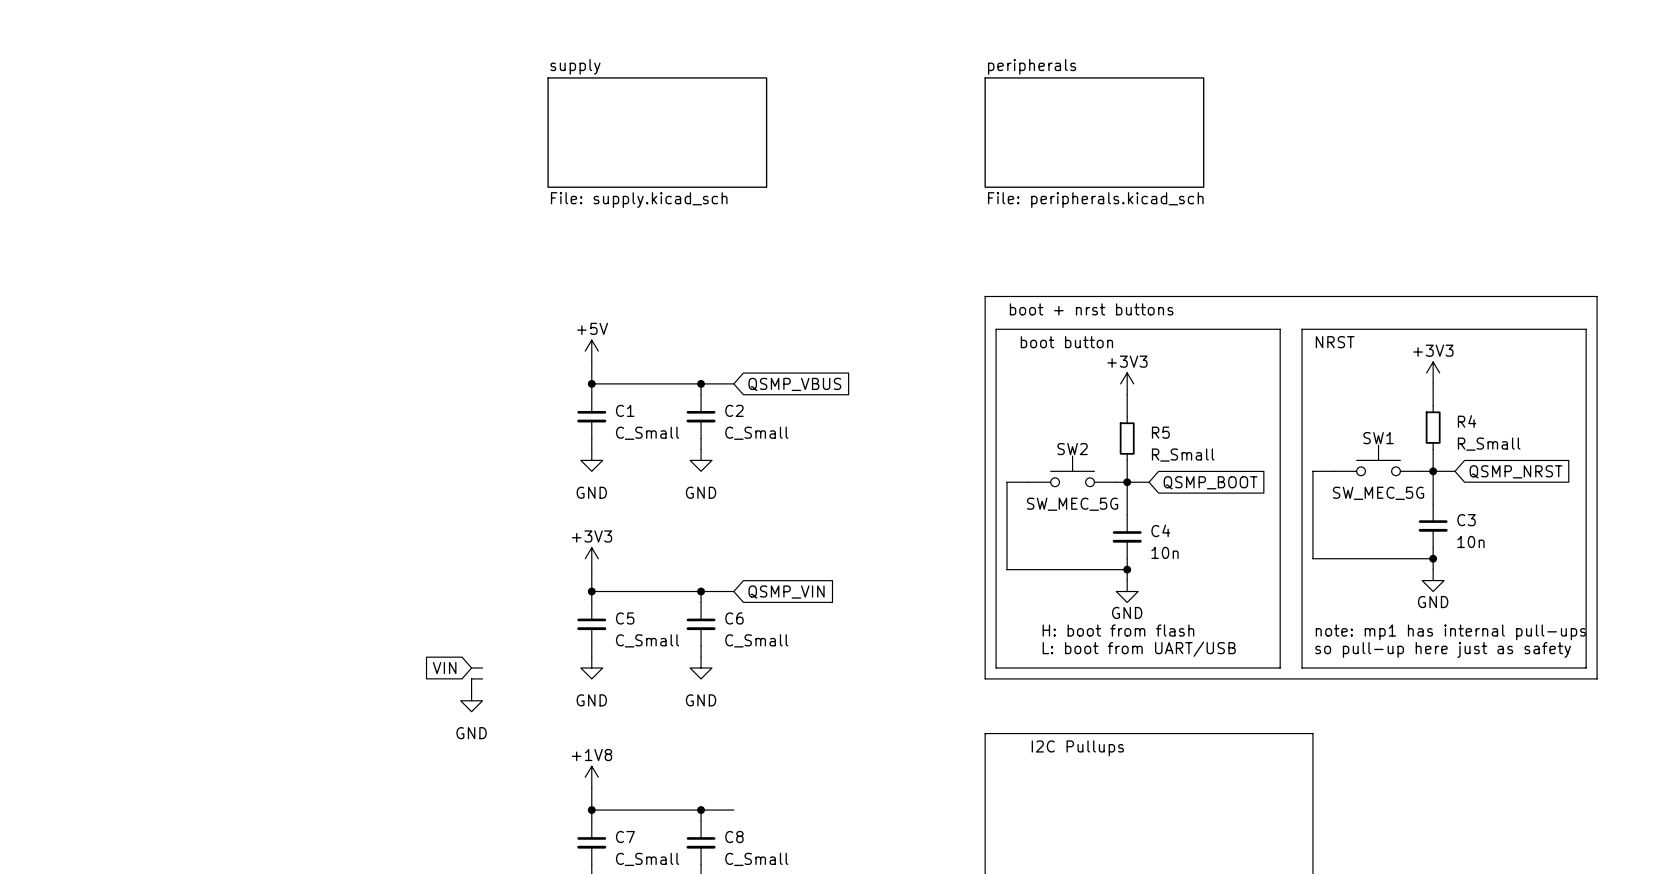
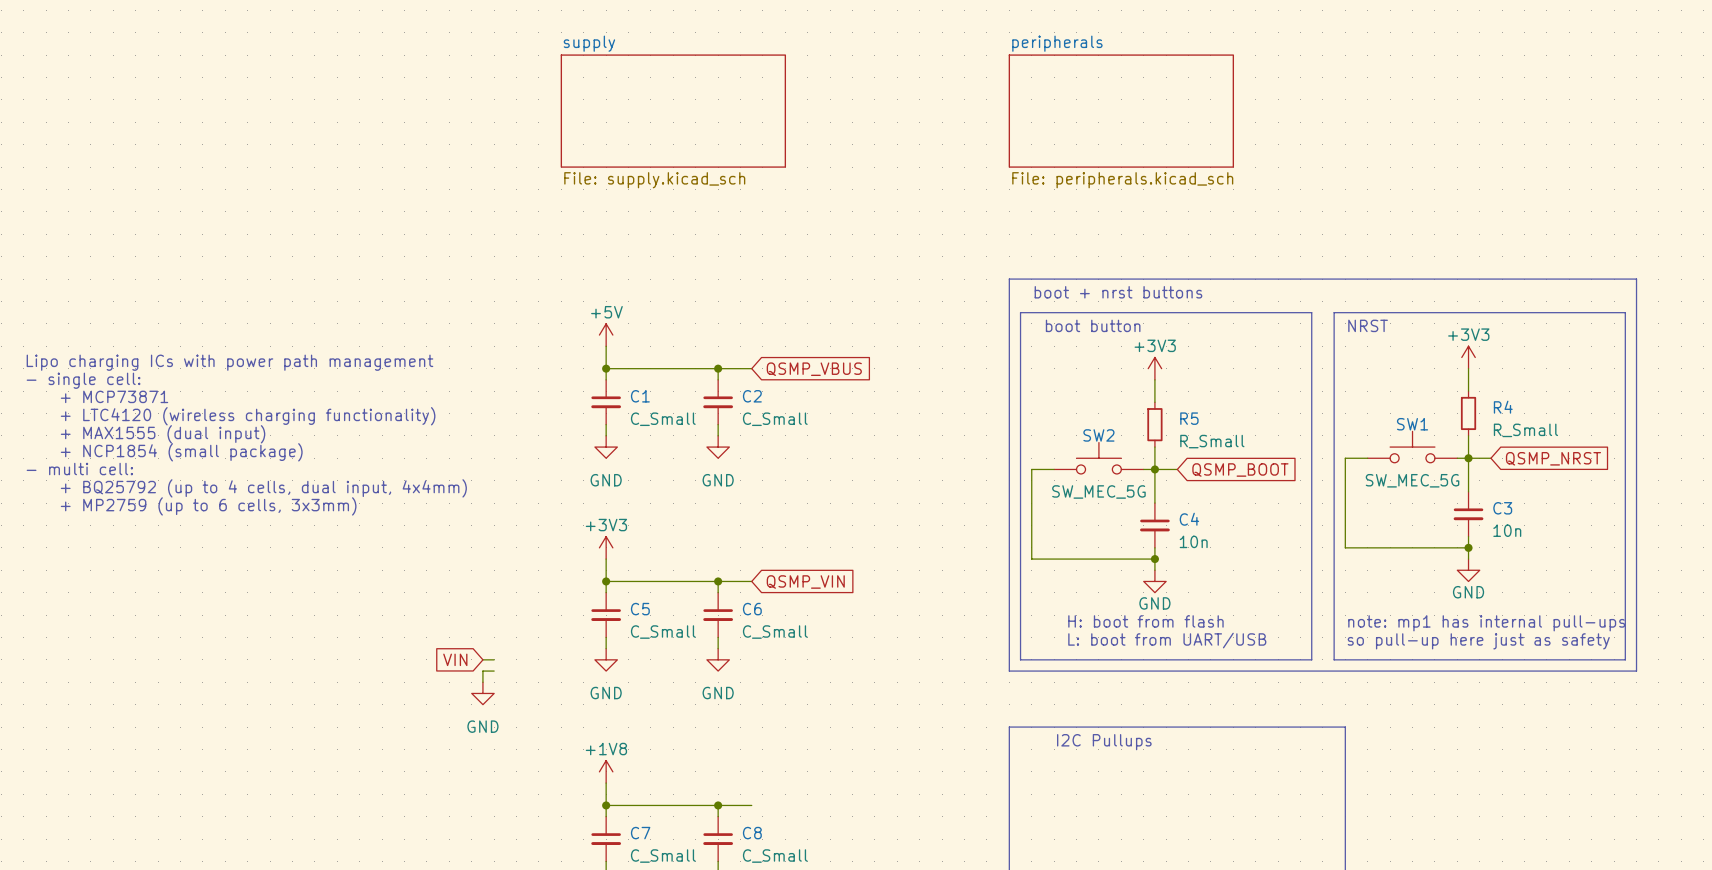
text: none -> Lipo charging ICs with power path management (229, 362)
text: none -> - single cell: (83, 380)
text: none -> + MCP73871 (114, 396)
text: none -> + LTC4120 (wireless charging functionality) (248, 416)
text: none -> + MAX1555 (dual input) (163, 434)
text: none -> + NCP1854 (small package) (181, 452)
text: none -> - multi cell: (79, 469)
text: none -> + BQ25792 (up to 4 cells, dual input, 4x4mm) (263, 488)
text: none -> + MP2759 (up to 6 cells, 3x3mm) (208, 506)

